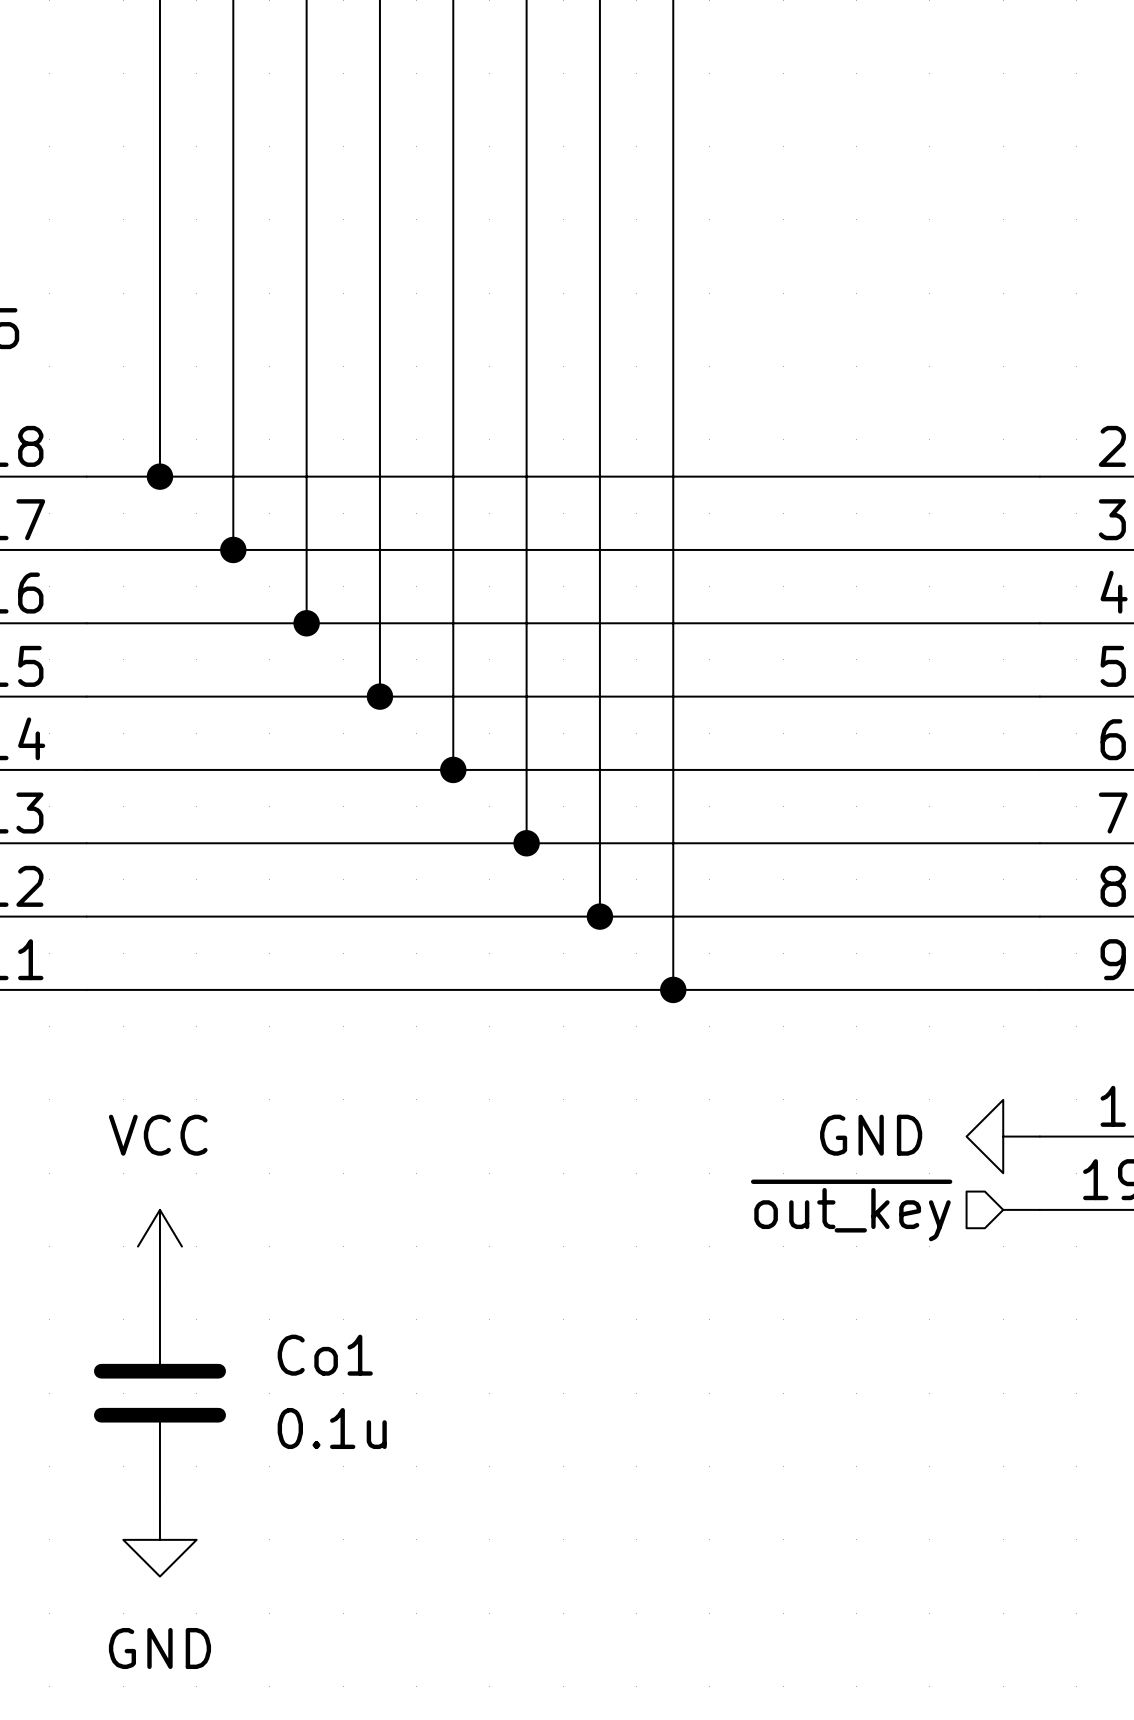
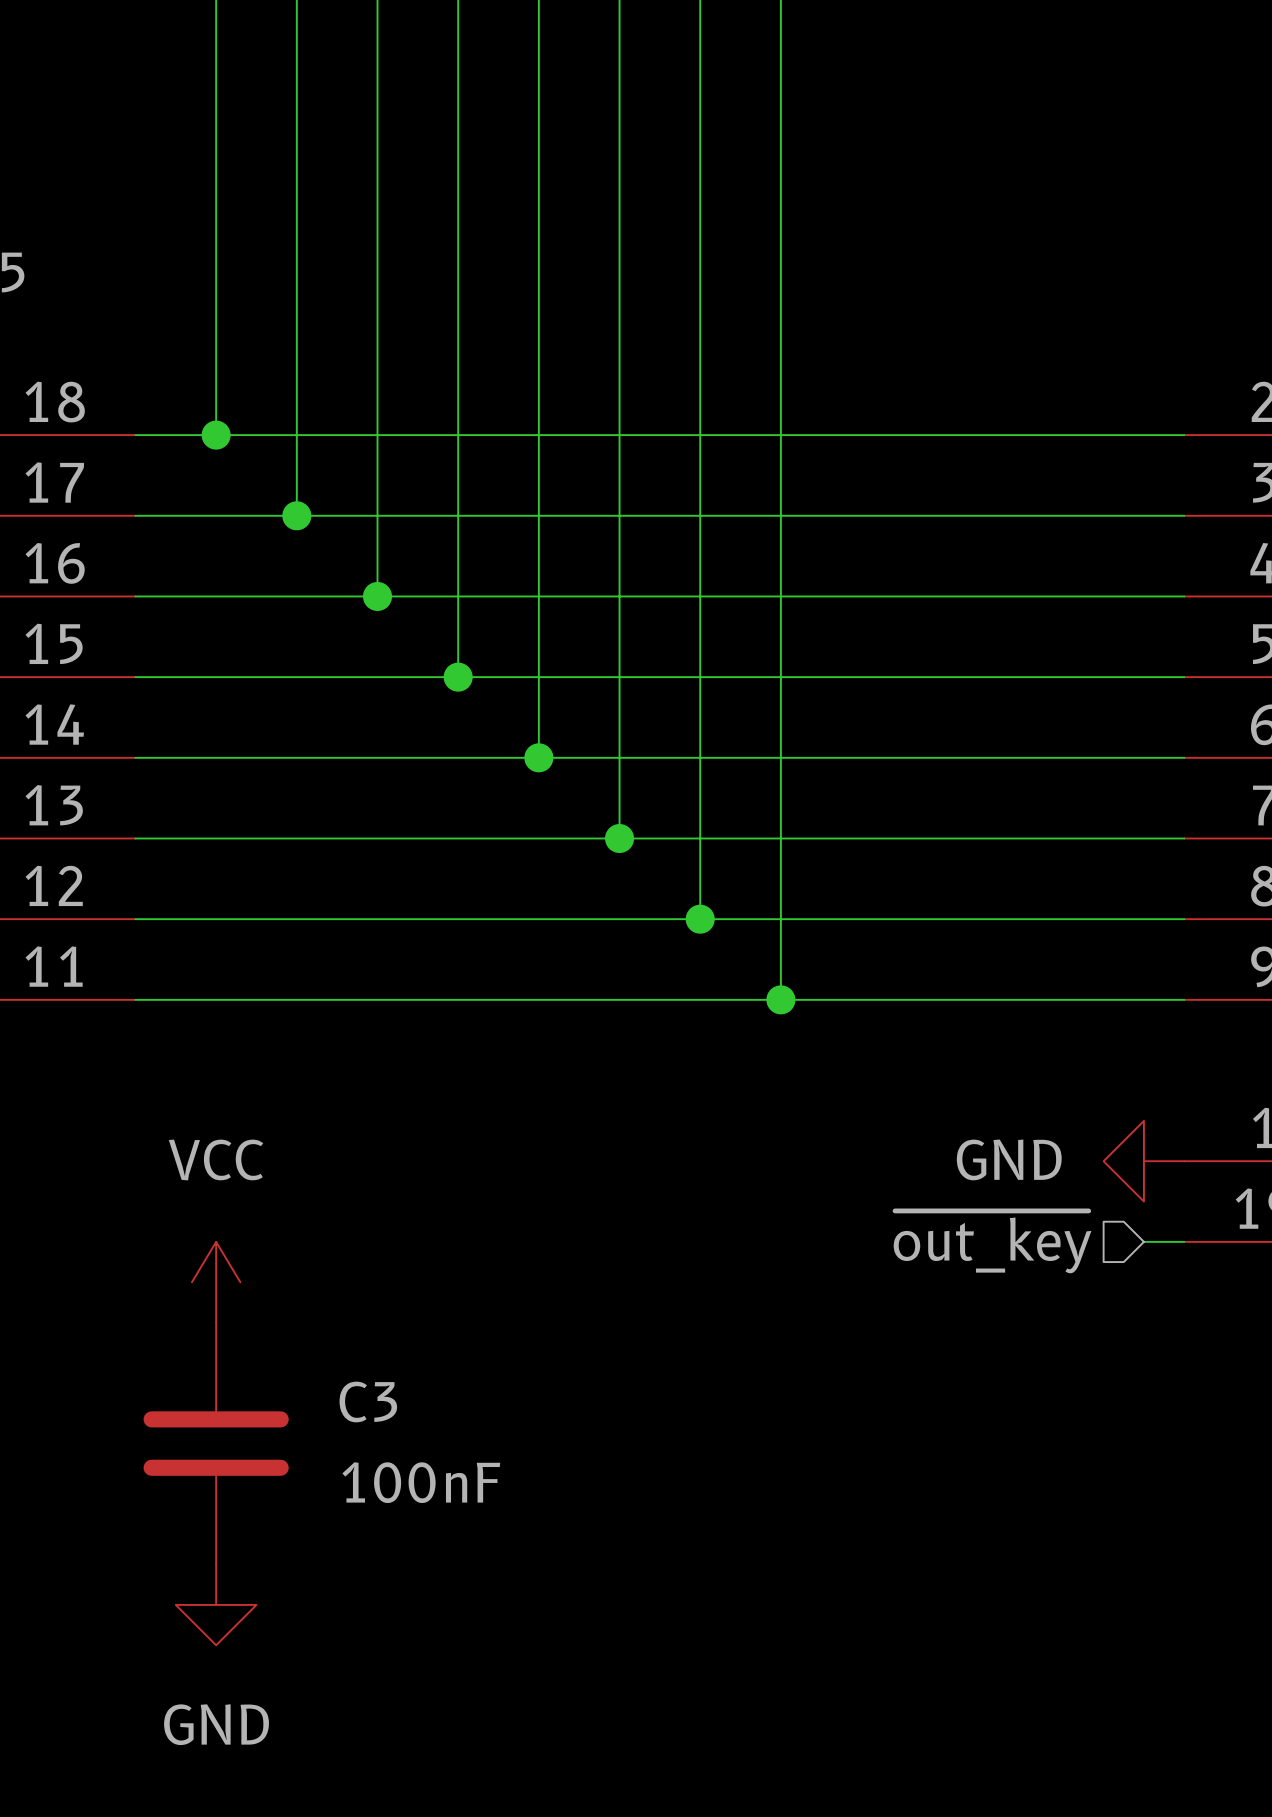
Co1 name: Co1 (325, 1355) -> C3 (368, 1402)
Co1 value: 0.1u (332, 1428) -> 100nF (421, 1482)

